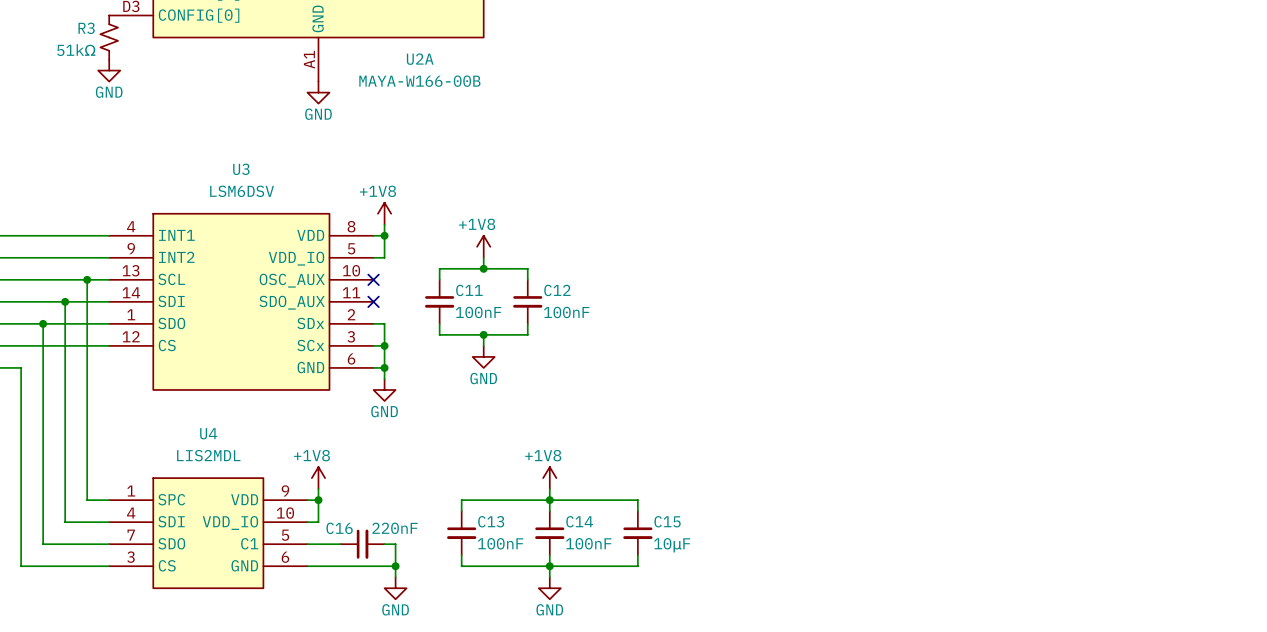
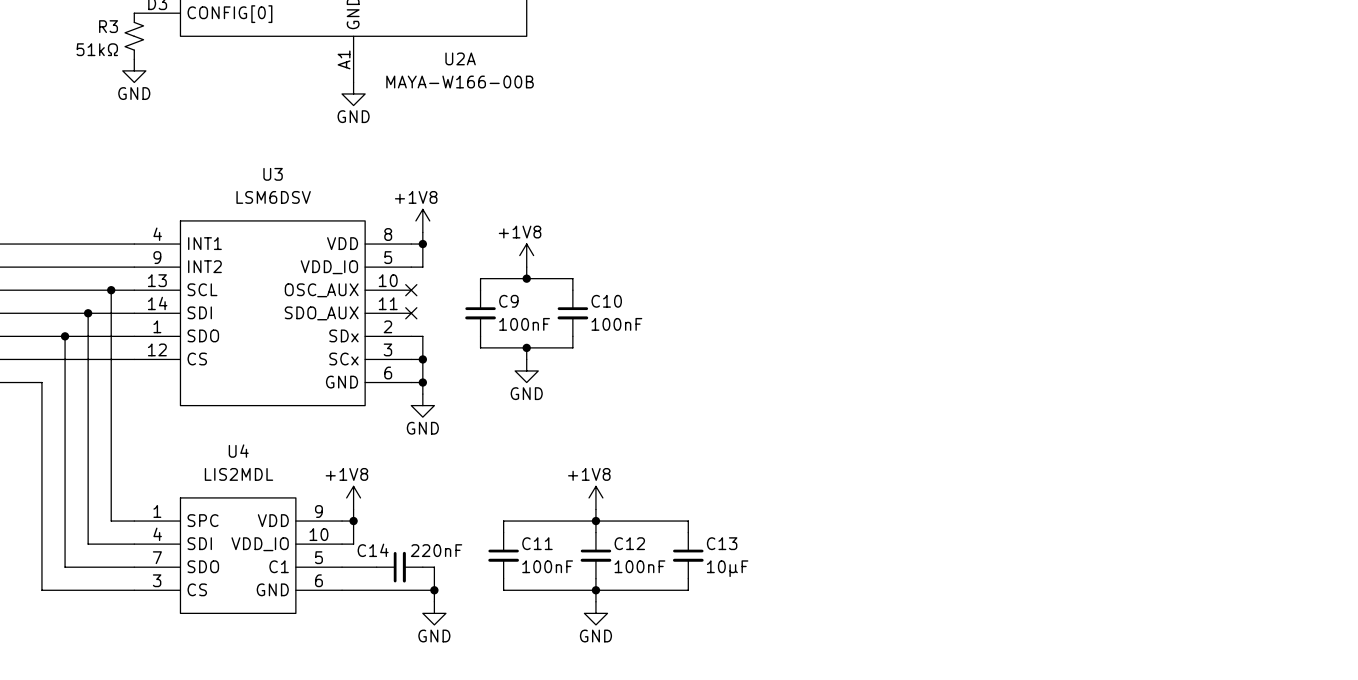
C11 name: C11 (469, 290) -> C9 (508, 301)
C12 name: C12 (557, 290) -> C10 (606, 301)
C13 name: C13 (491, 521) -> C11 (537, 543)
C14 name: C14 (579, 521) -> C12 (629, 543)
C15 name: C15 (667, 521) -> C13 (722, 543)
C16 name: C16 (339, 528) -> C14 (373, 550)

